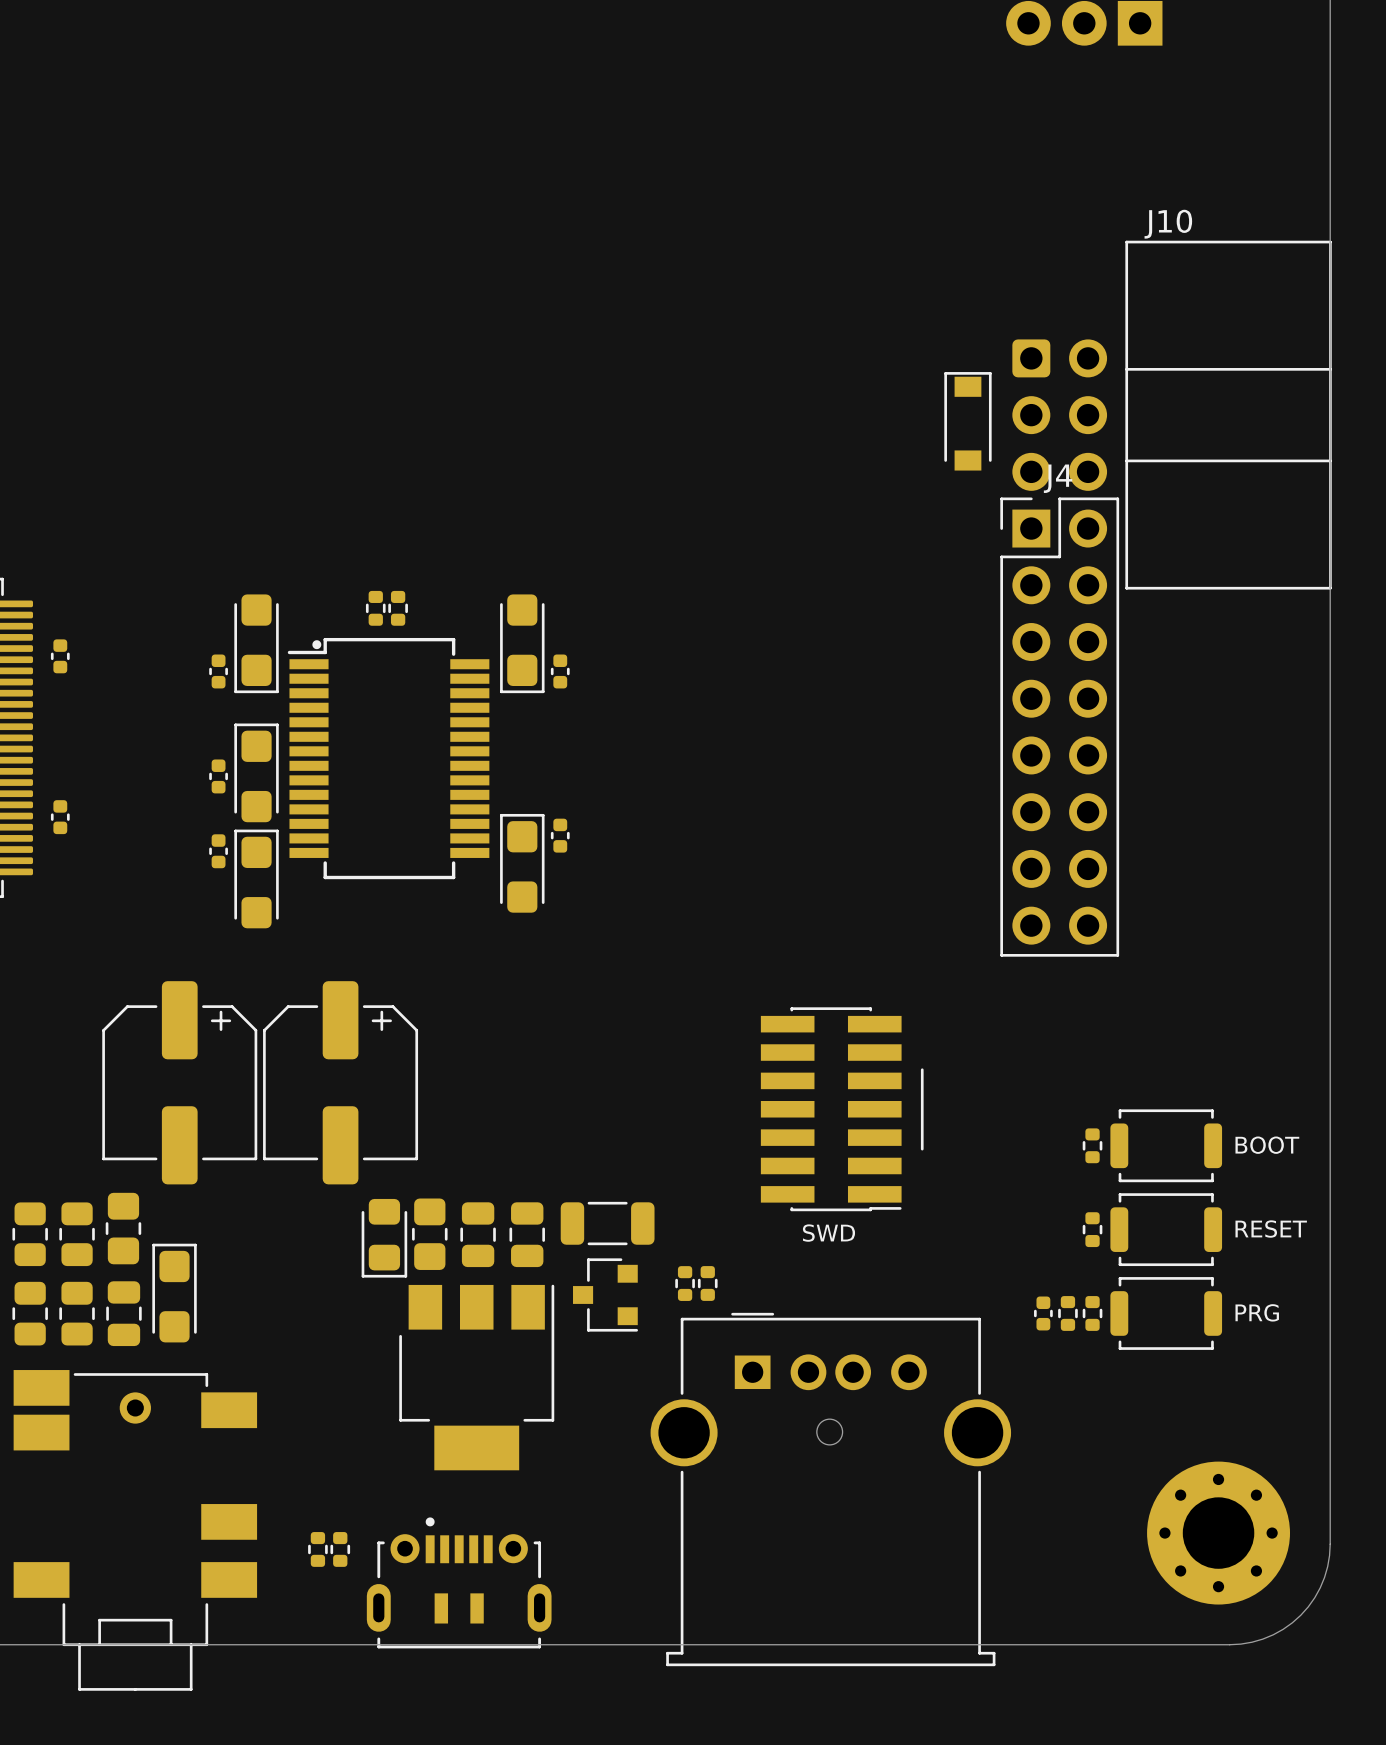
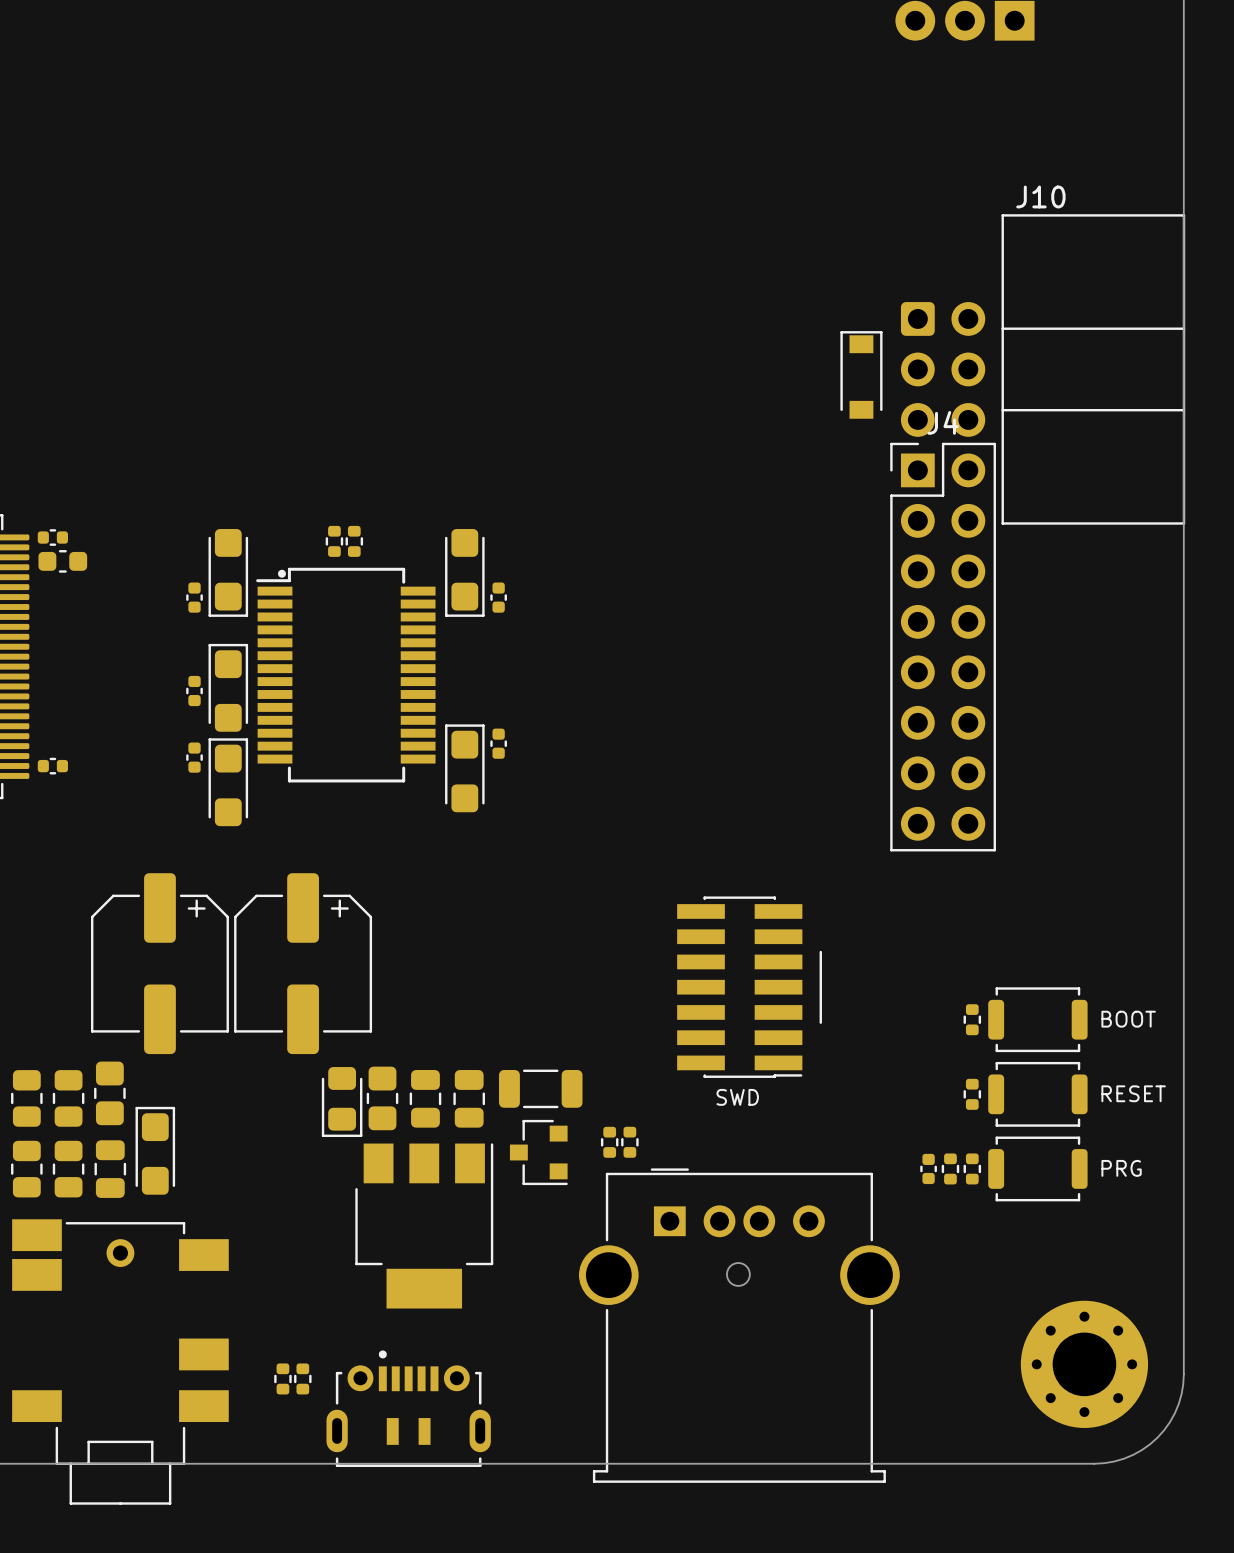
part: none -> (62, 561)
part rotation: 0° (60, 656) -> 90° clockwise (52, 537)
part position: (60, 656) -> (52, 537)
part rotation: 0° (60, 817) -> 90° clockwise (52, 766)
part position: (60, 817) -> (52, 766)

